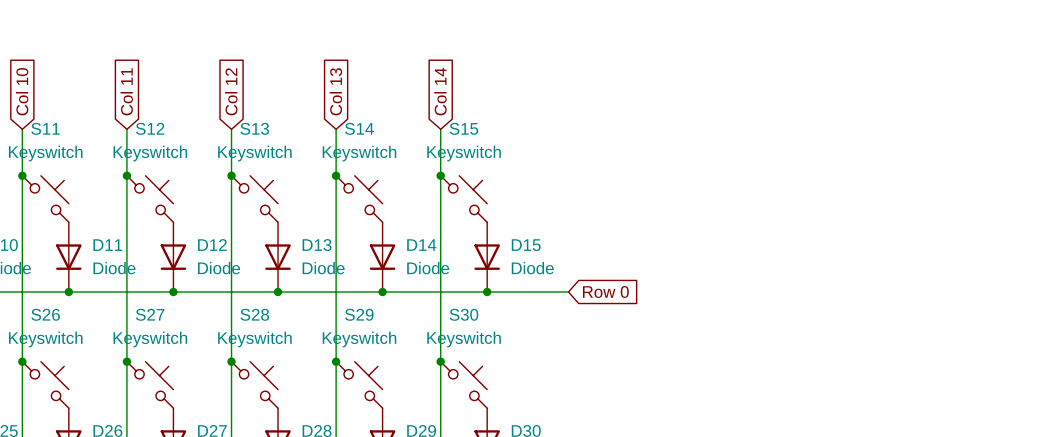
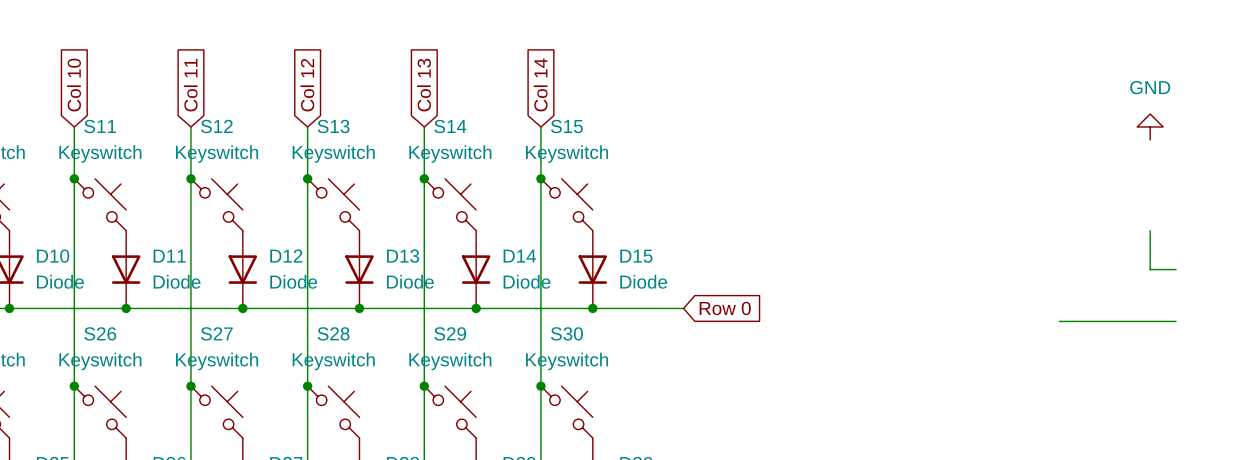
power symbol: none -> GND (1150, 126)
wire: none -> (1150, 230) (1150, 269) (1176, 269)
wire: none -> (1059, 321) (1176, 321)

